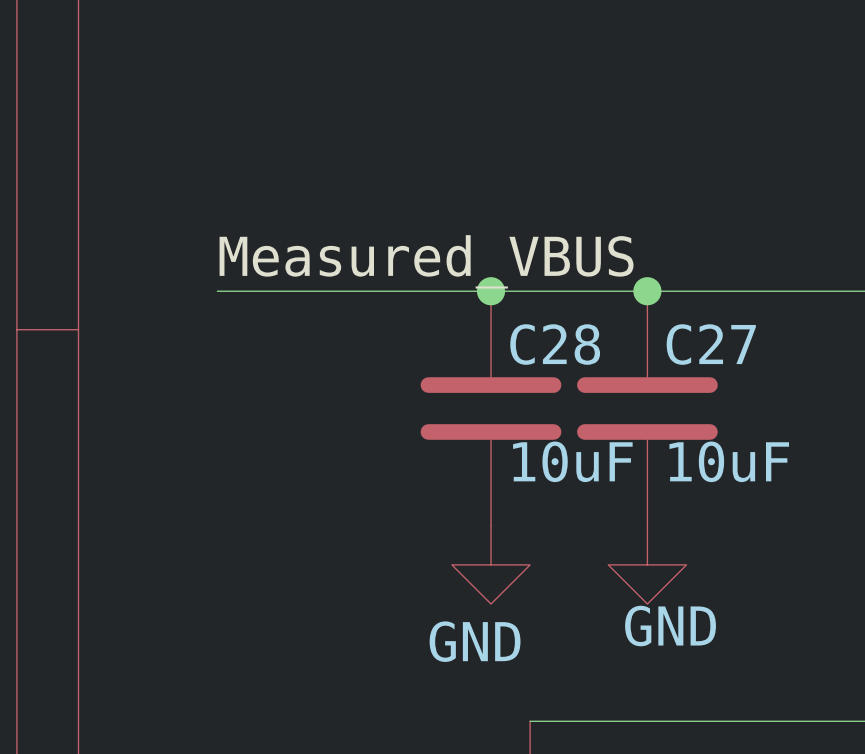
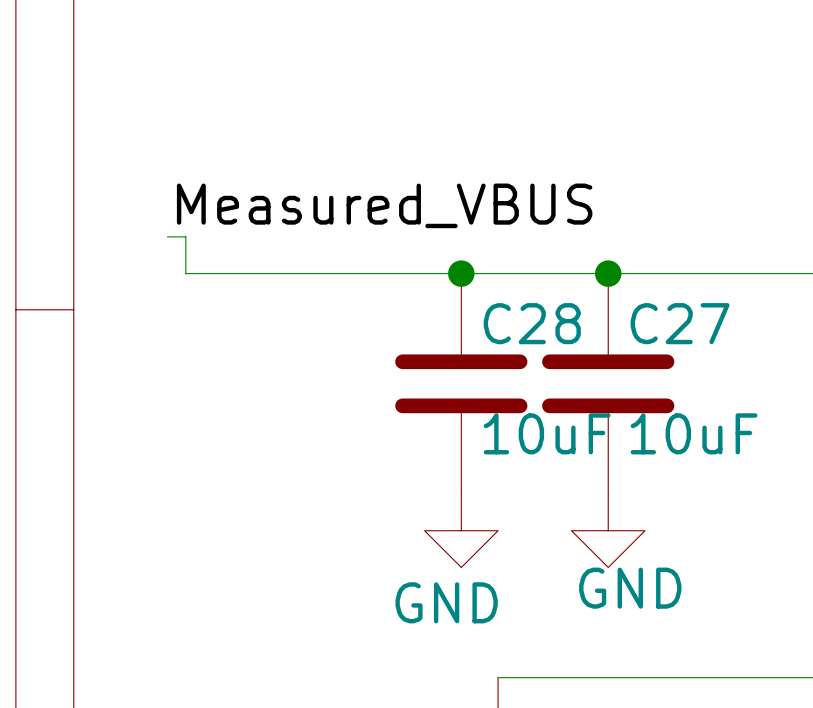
wire: none -> (167, 236) (185, 236) (185, 273) (204, 273)
label position: Measured_VBUS (426, 261) -> Measured_VBUS (384, 205)

